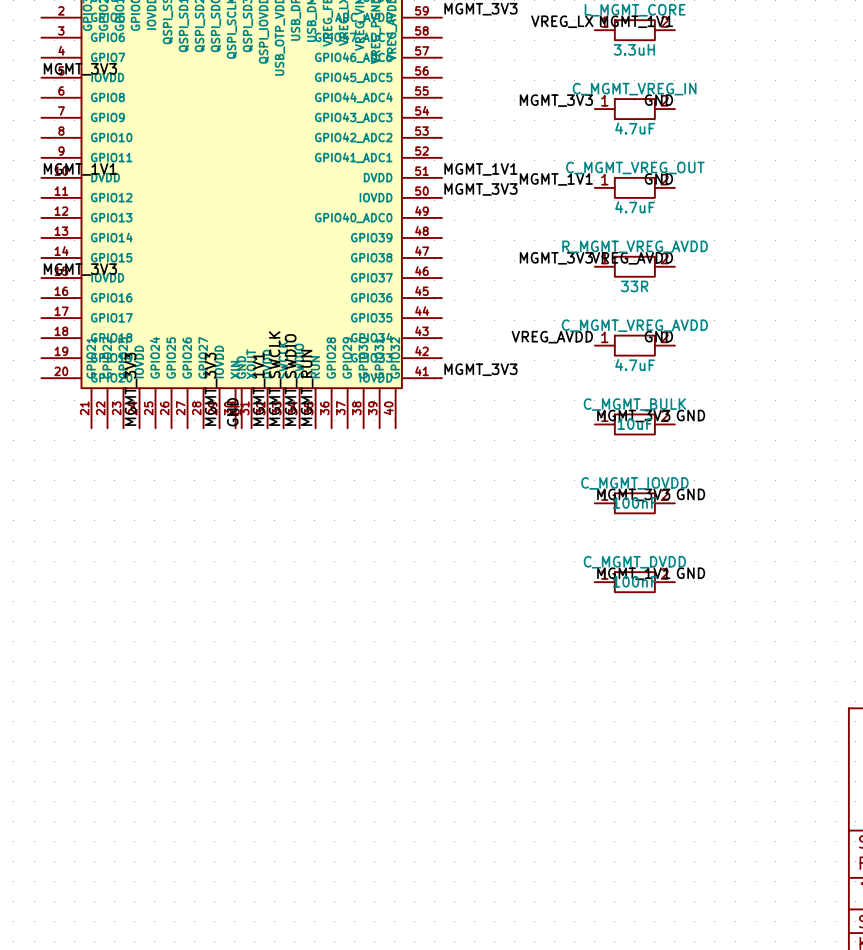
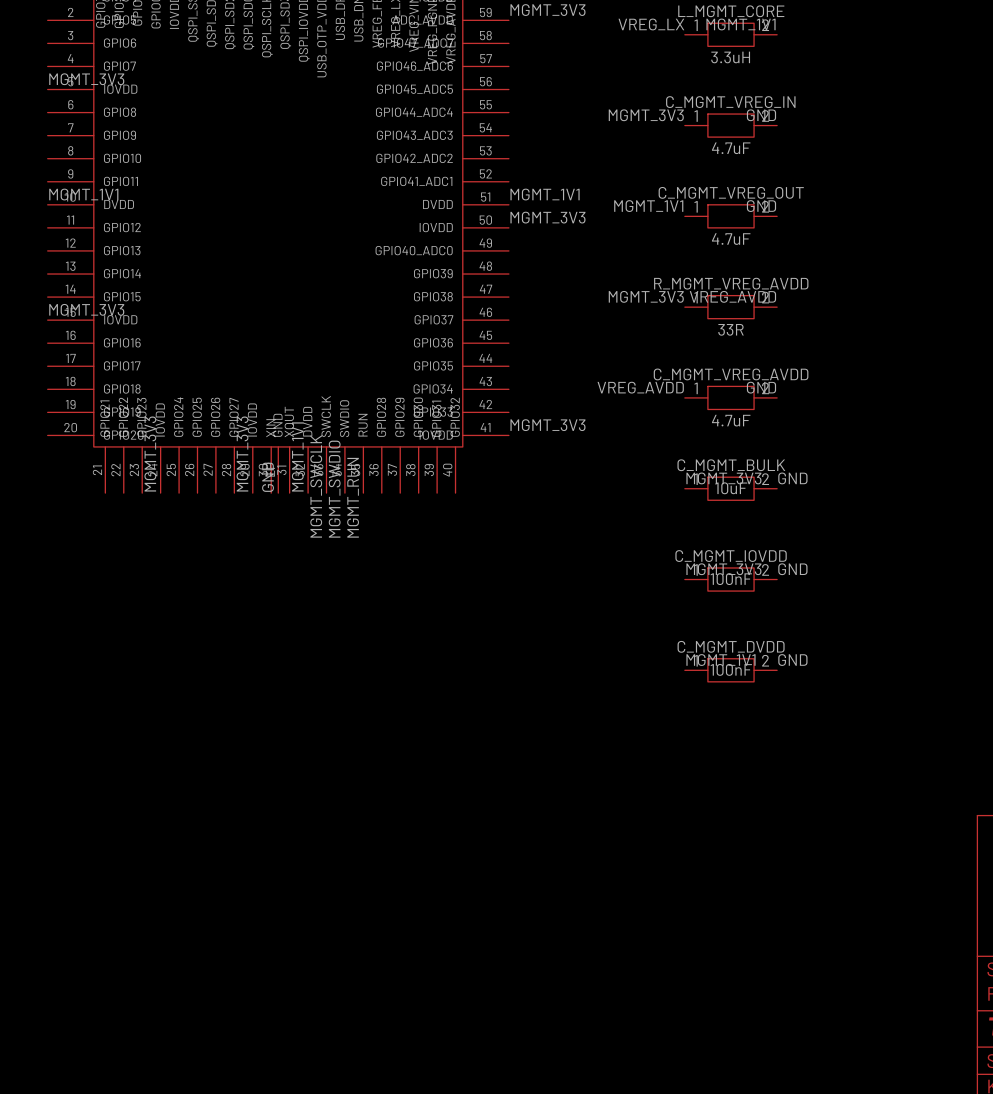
label position: MGMT_SWCLK (275, 378) -> MGMT_SWCLK (316, 486)
label position: MGMT_SWDIO (291, 380) -> MGMT_SWDIO (334, 489)
label position: MGMT_RUN (307, 387) -> MGMT_RUN (353, 497)

